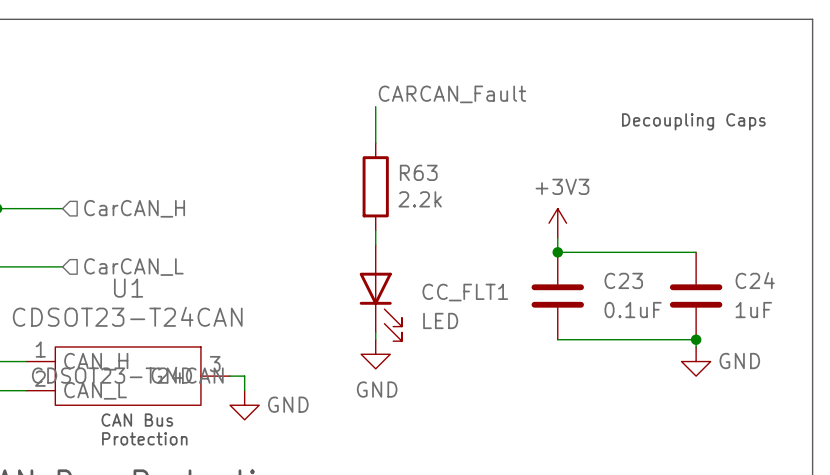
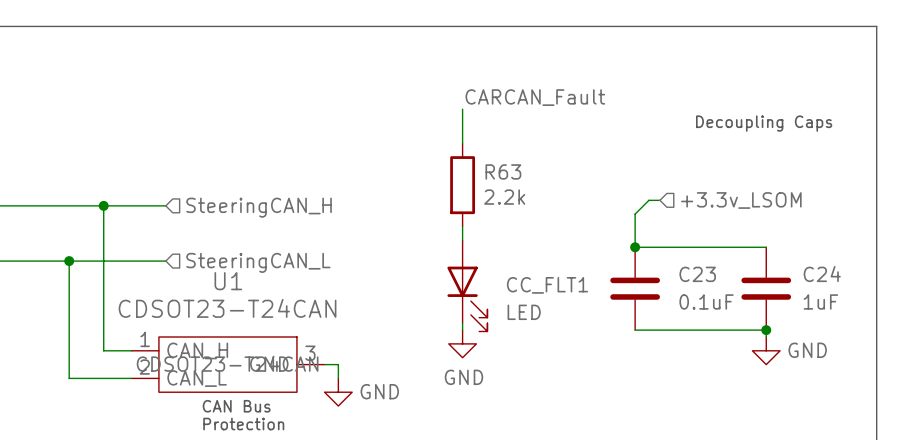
wire: none -> (659, 200) (648, 200) (635, 214) (635, 233)
hierarchical label: none -> +3.3v_LSOM (741, 200)
hierarchical label: CarCAN_H (134, 208) -> SteeringCAN_H (259, 207)
power symbol: +3V3 (557, 223) -> none
hierarchical label: CarCAN_L (133, 267) -> SteeringCAN_L (258, 262)

